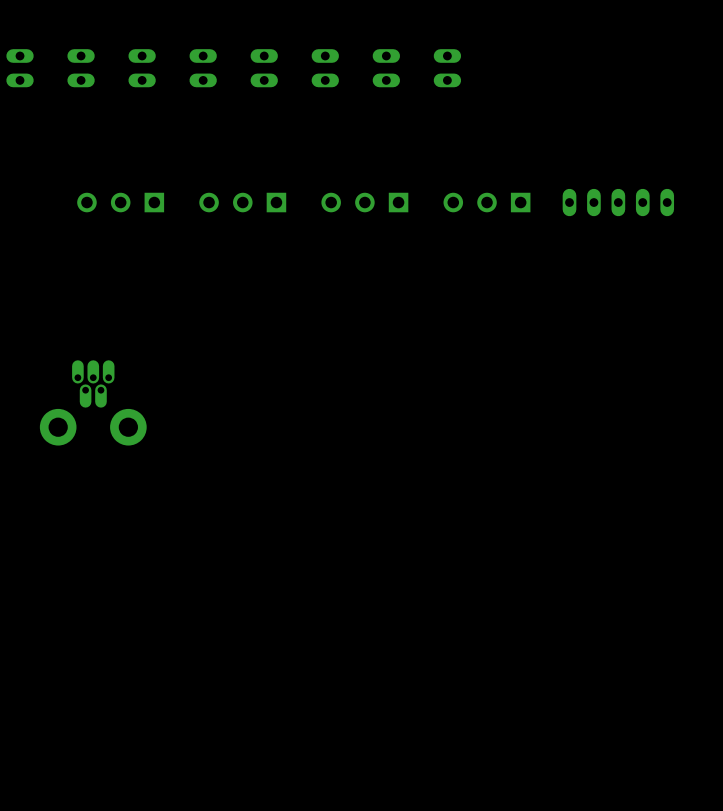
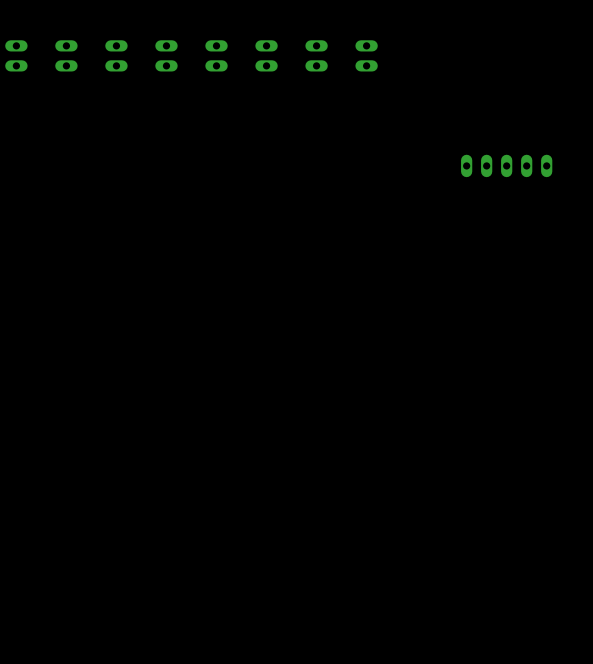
part: (120, 202) -> none
part: (242, 202) -> none
part: (364, 202) -> none
part: (486, 202) -> none
part: (93, 402) -> none

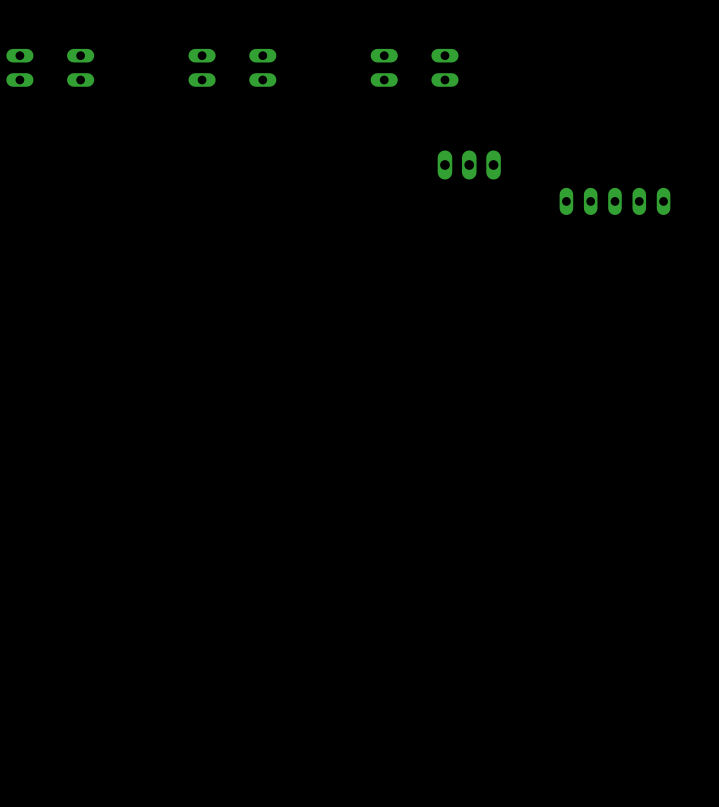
part: (116, 55) -> none
part: (266, 55) -> none
part: none -> (469, 164)

